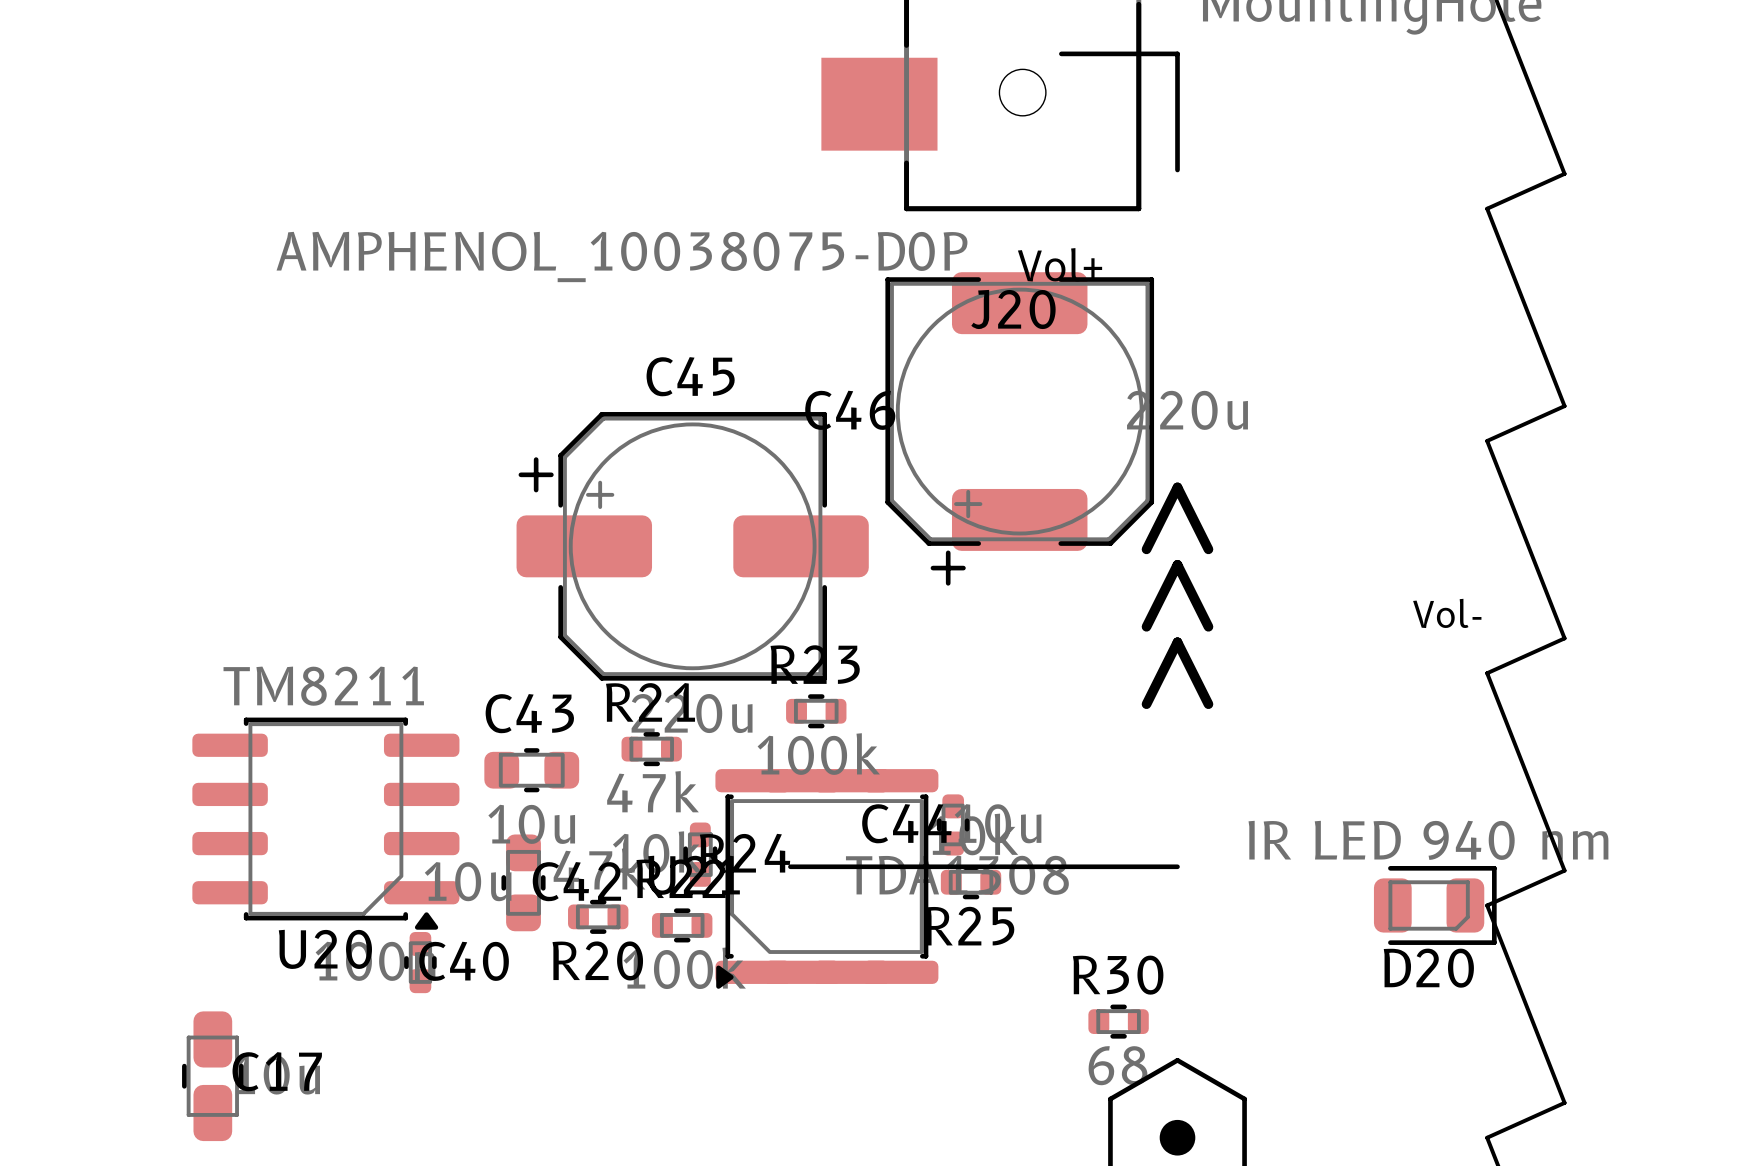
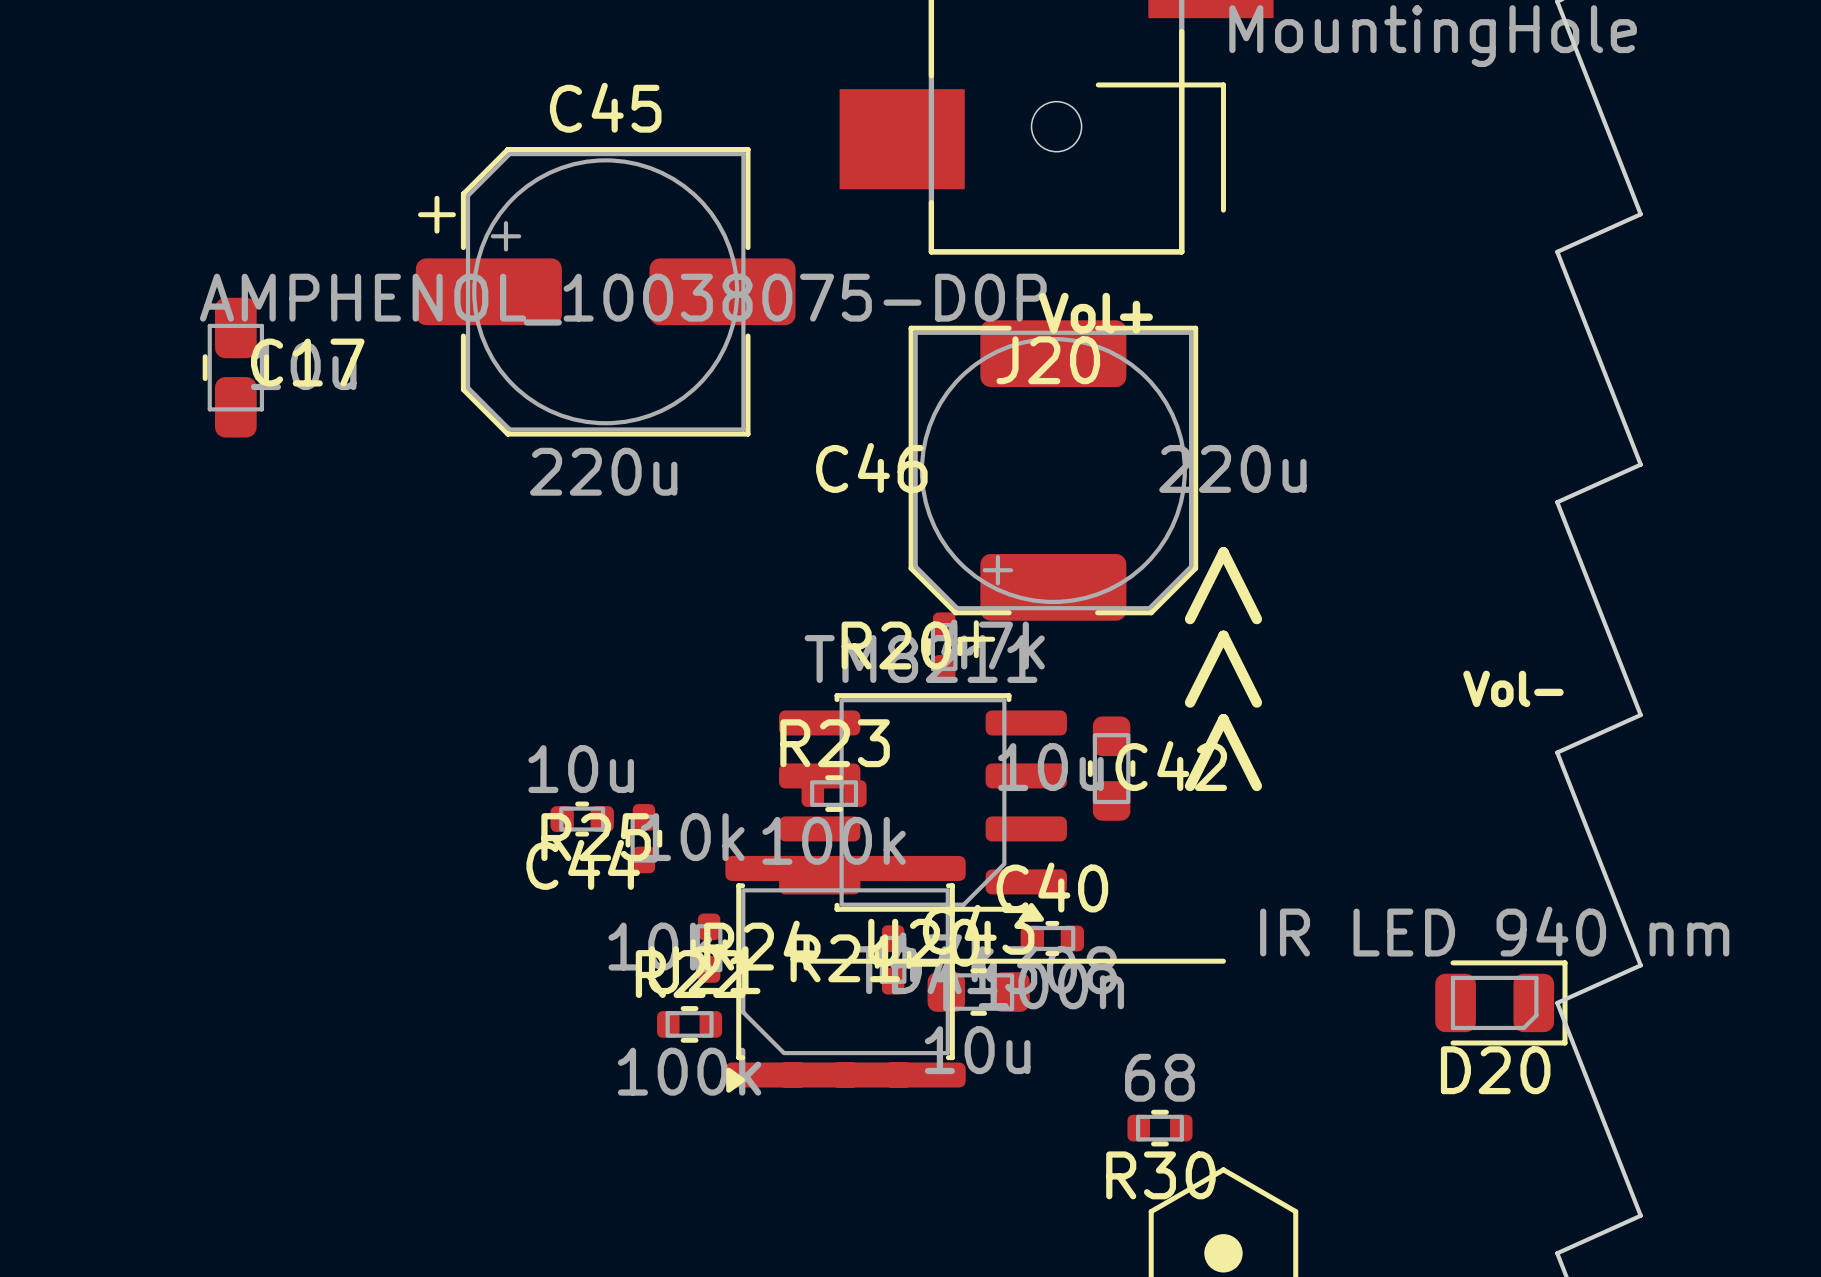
C45 footprint: [516, 412, 869, 681] -> [415, 147, 796, 437]
R21 footprint: [621, 732, 682, 767] -> [874, 925, 912, 995]
C43 position: (531, 770) -> (978, 992)
C44 footprint: [936, 794, 970, 856] -> [550, 801, 614, 837]
U20 position: (325, 823) -> (922, 807)
R25 footprint: [940, 865, 1002, 900] -> [625, 804, 663, 874]
C42 position: (523, 882) -> (1111, 768)
R20 footprint: [568, 899, 629, 934] -> [925, 612, 963, 682]
C40 footprint: [404, 931, 437, 994] -> [1020, 920, 1085, 956]
R30 name position: R30 (1118, 975) -> R30 (1160, 1175)
R30 value position: 68 (1118, 1065) -> 68 (1159, 1077)
C17 position: (212, 1076) -> (235, 367)

